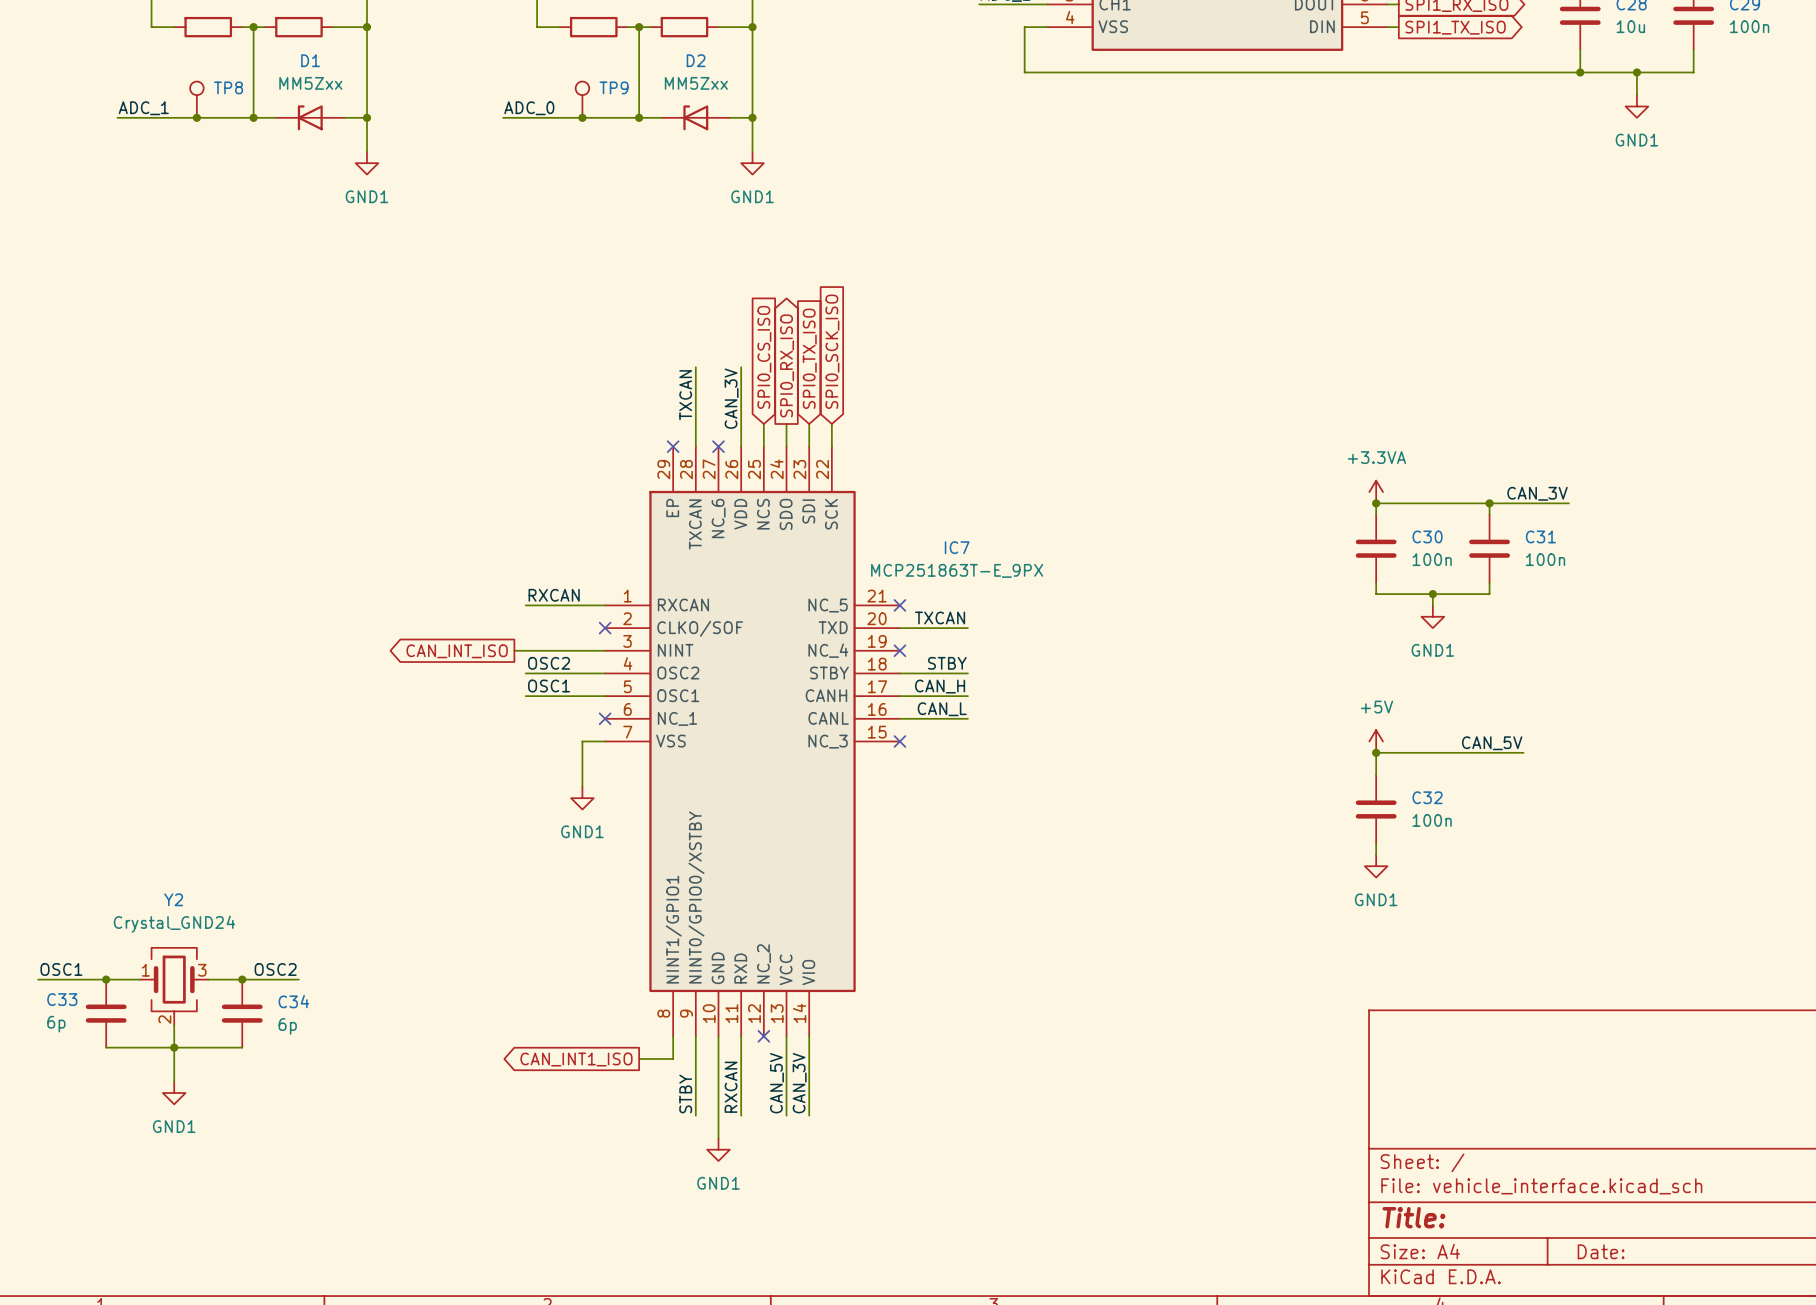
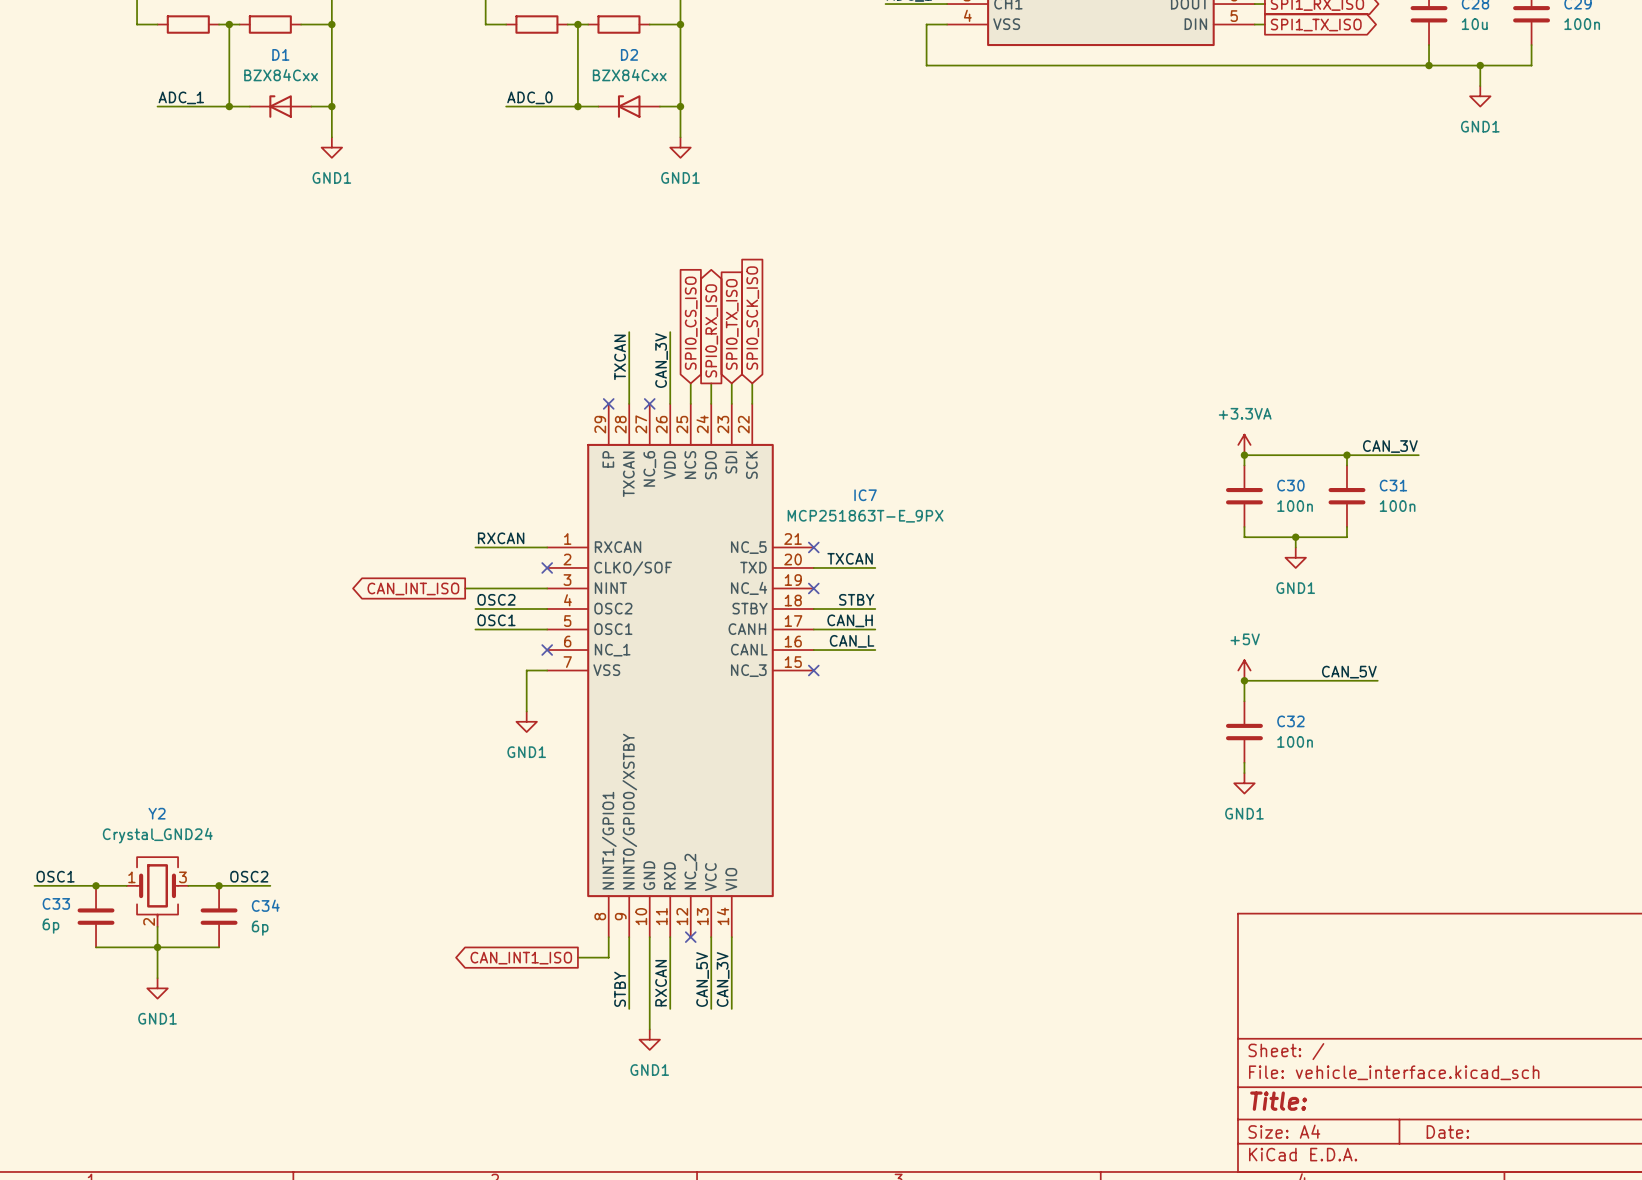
D1 value: MM5Zxx (310, 83) -> BZX84Cxx (281, 75)
D2 value: MM5Zxx (696, 83) -> BZX84Cxx (629, 75)
TP8: (196, 99) -> none
TP9: (582, 99) -> none
label position: ADC_1 (143, 108) -> ADC_1 (181, 97)
label position: ADC_0 (529, 108) -> ADC_0 (529, 97)
wire: (117, 117) (174, 117) -> none
junction: (196, 117) -> none
wire: (503, 117) (559, 117) -> none
junction: (582, 117) -> none

